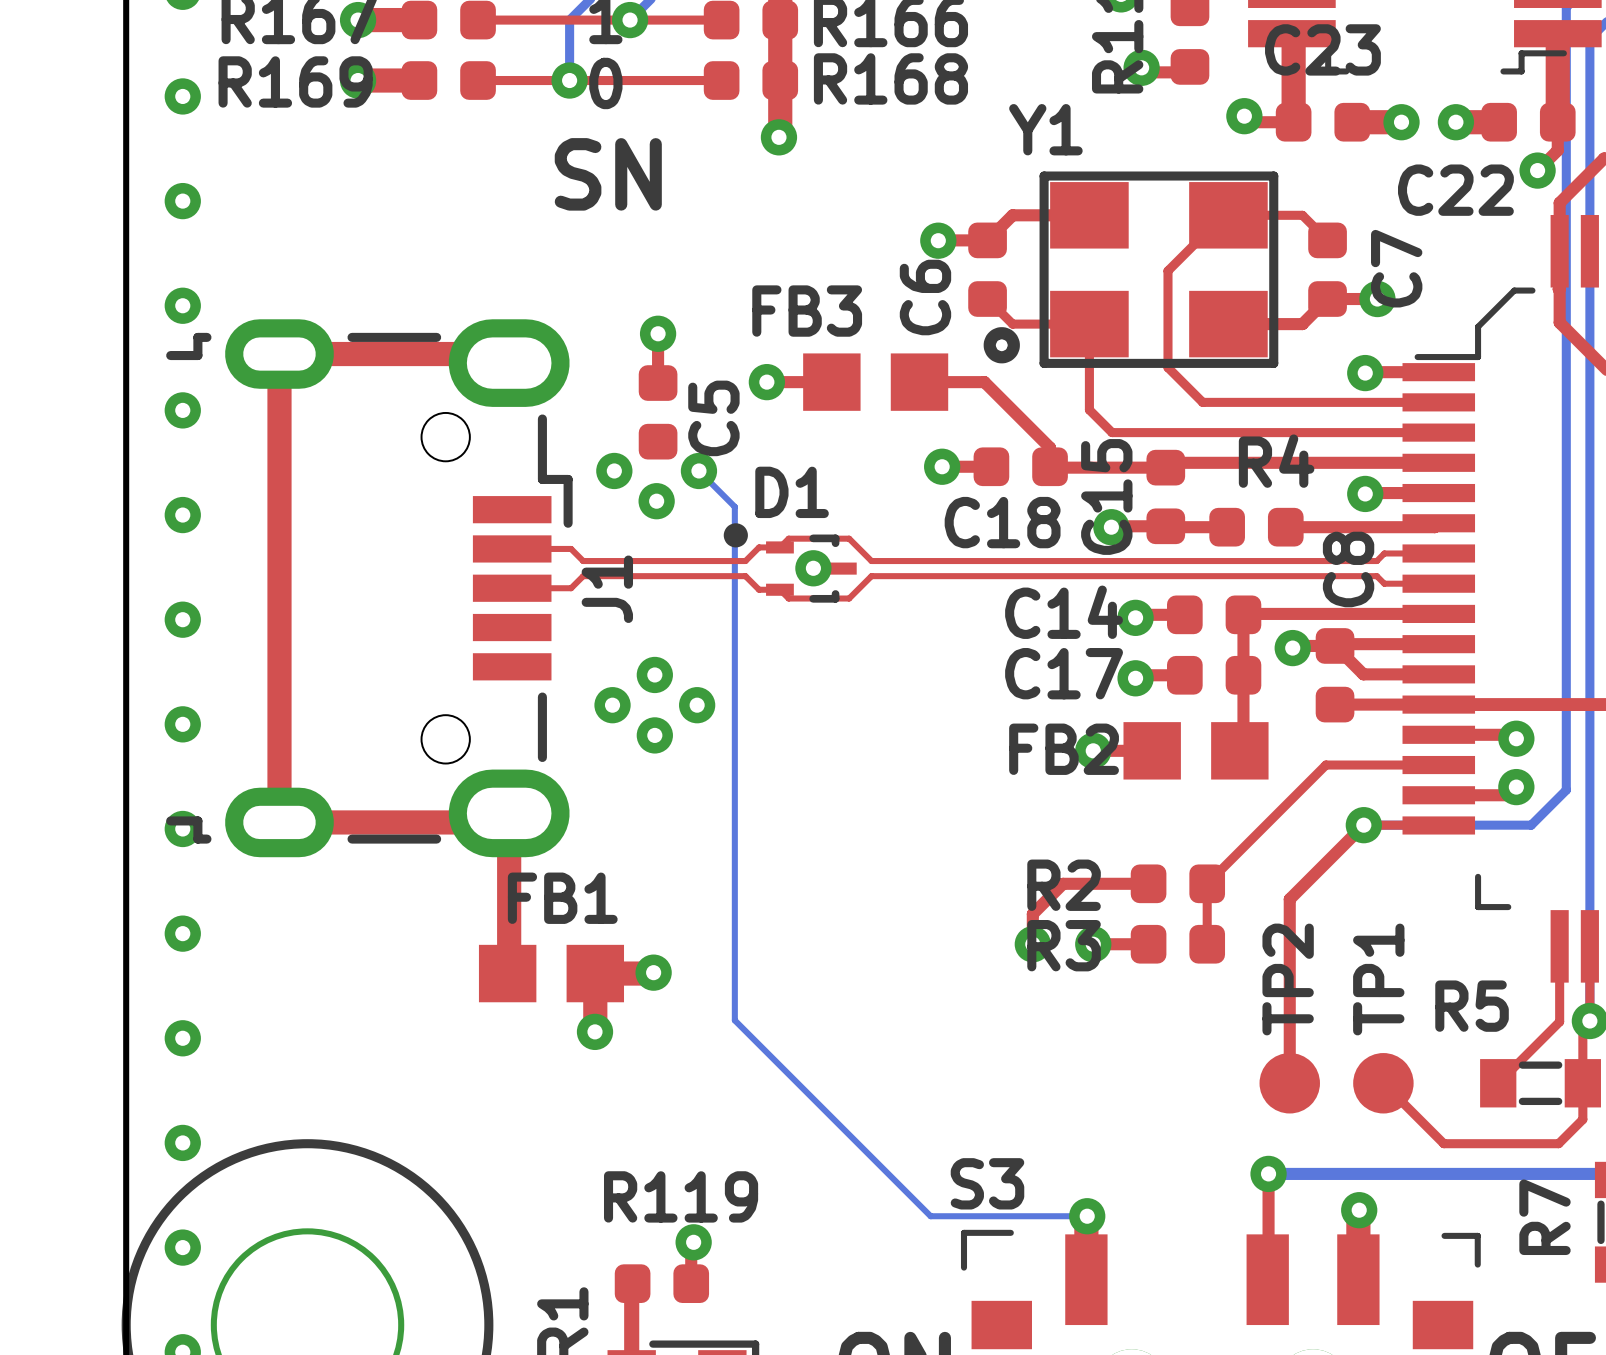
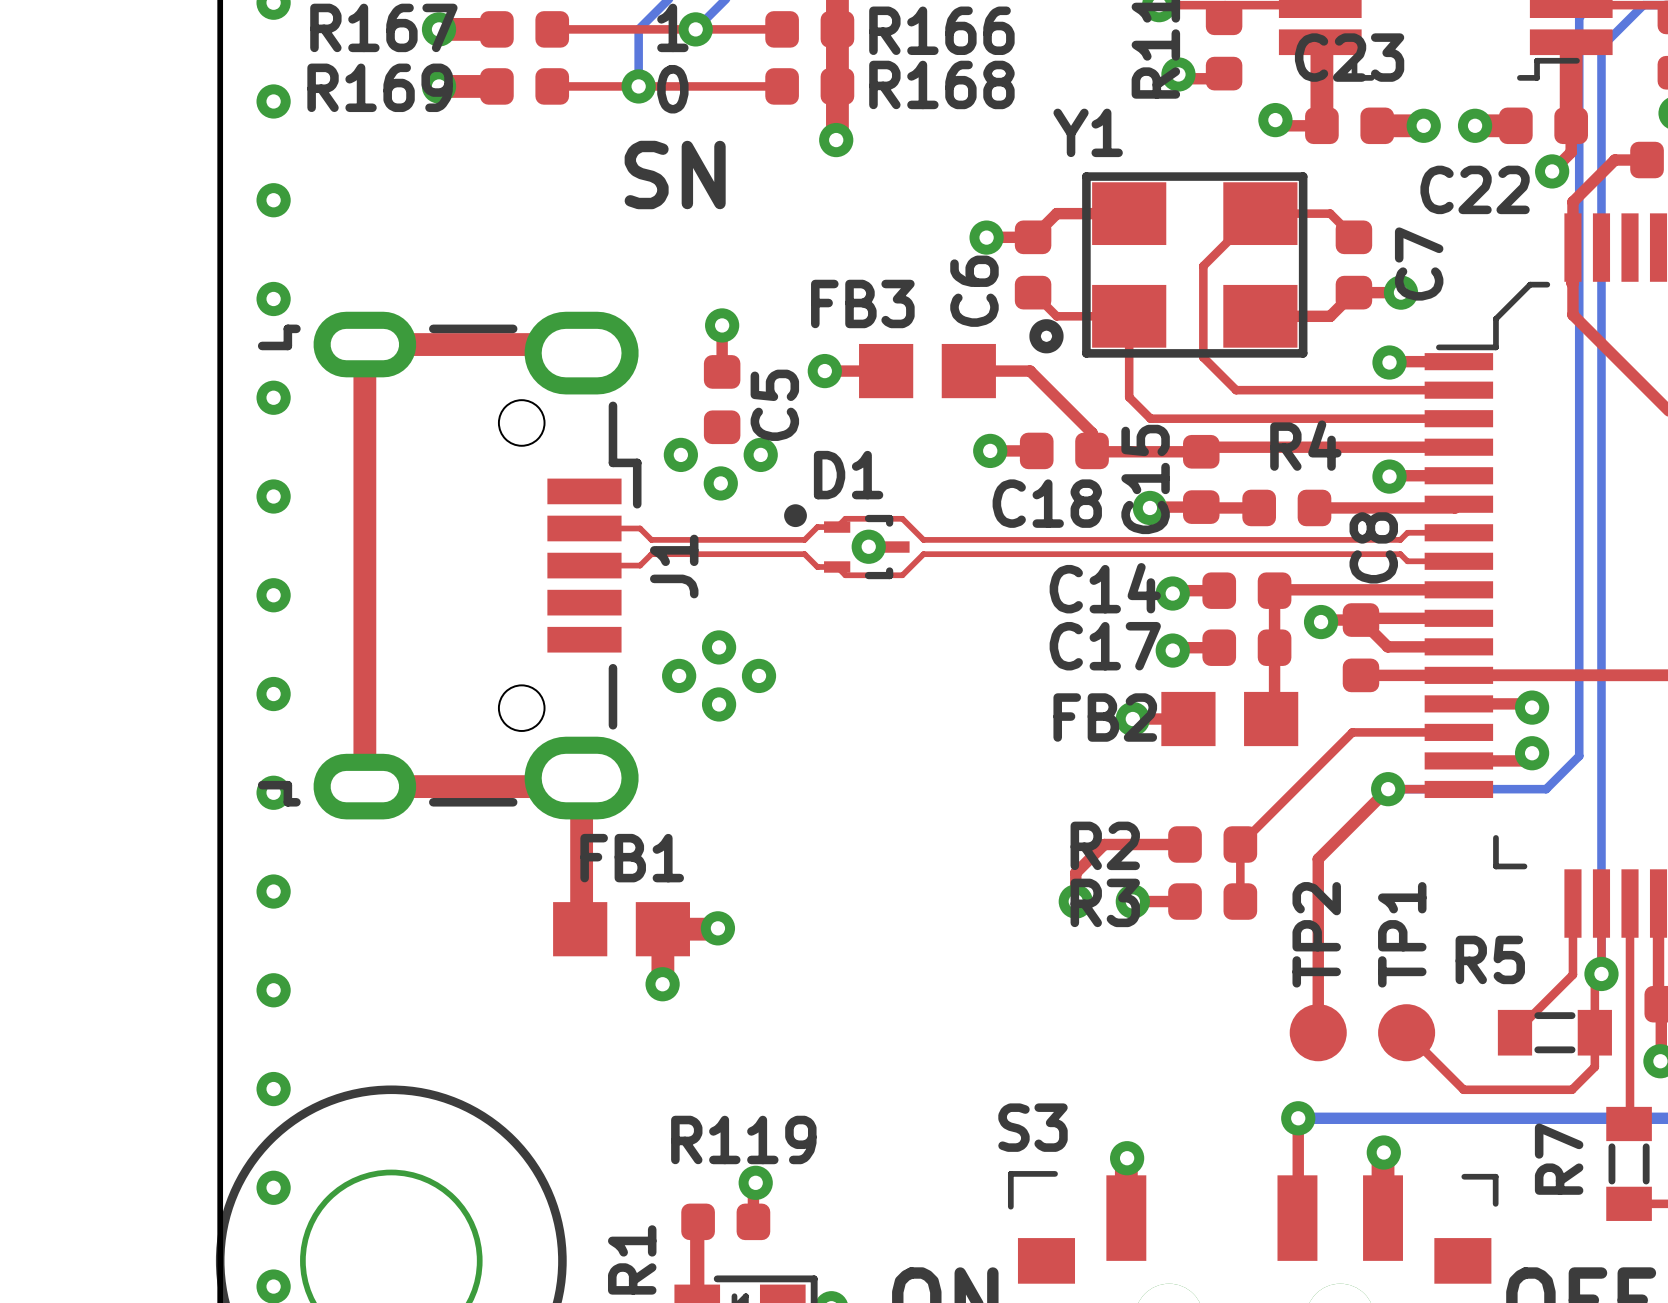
bottom track: (698, 470) (734, 506) (734, 1020) (930, 1216) (1087, 1216) -> none

